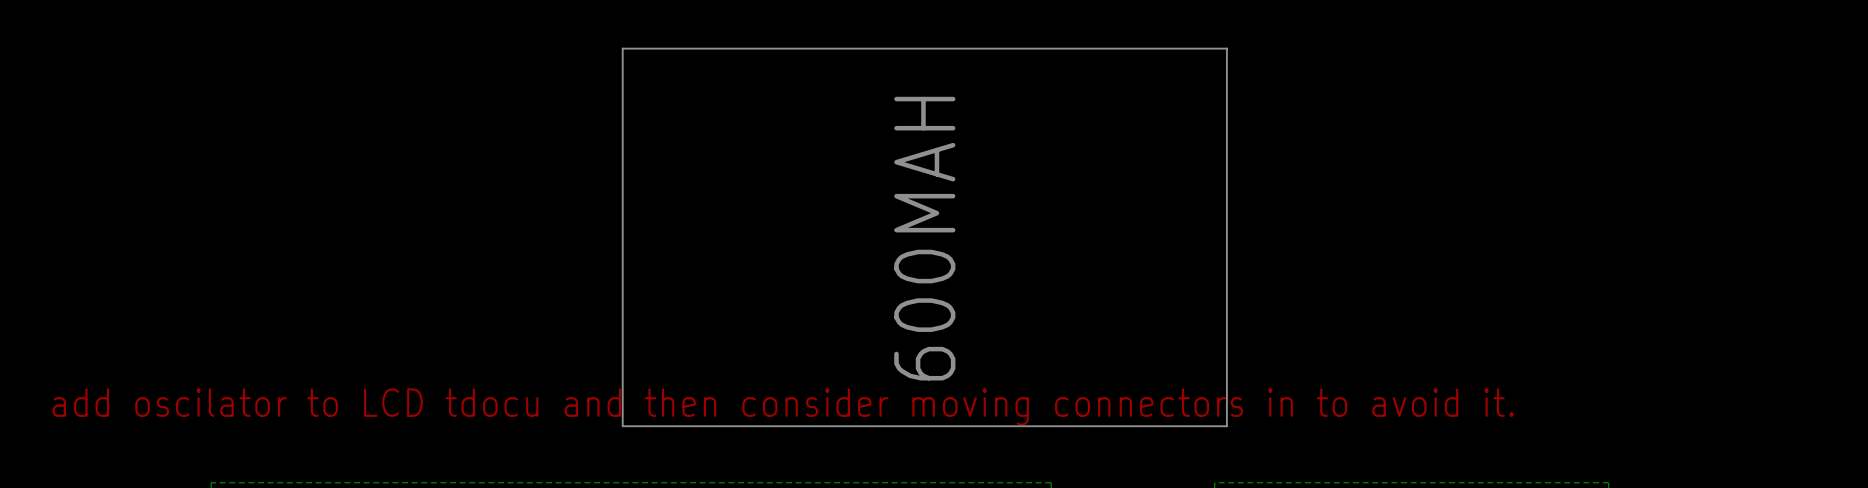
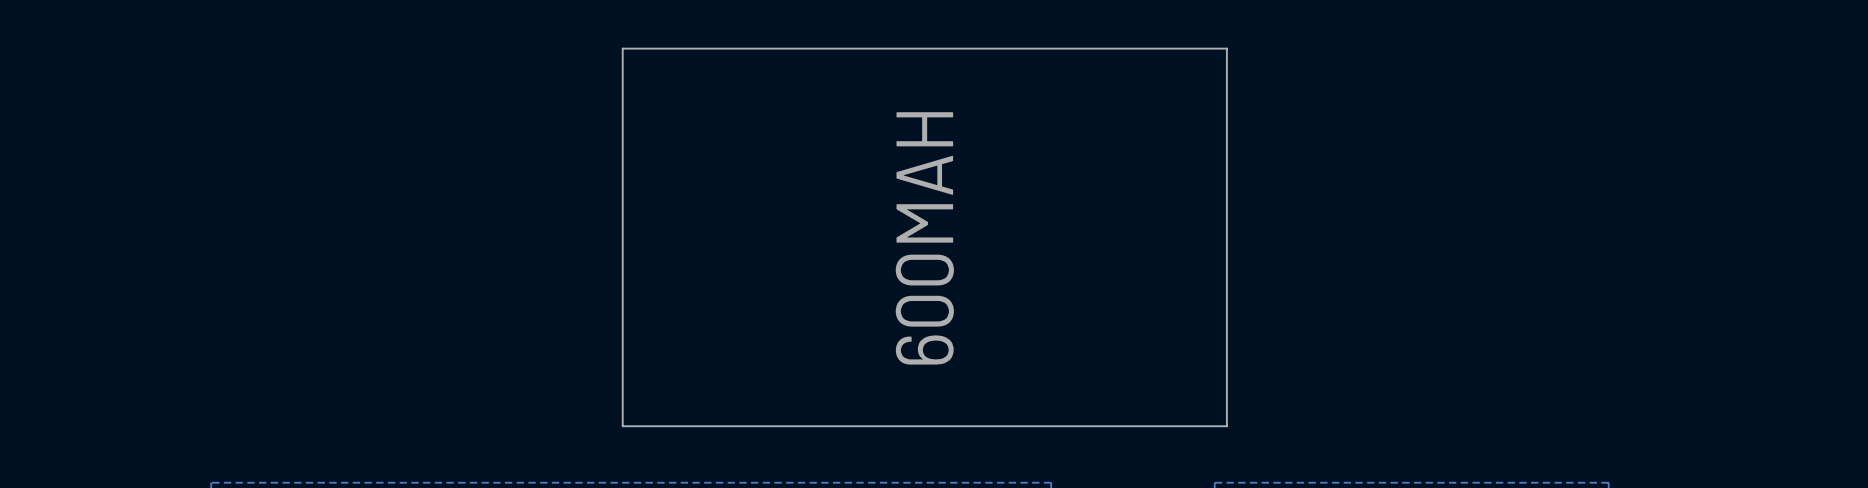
text: add oscilator to LCD tdocu and then consider moving connectors in to avoid it. (783, 407) -> none

